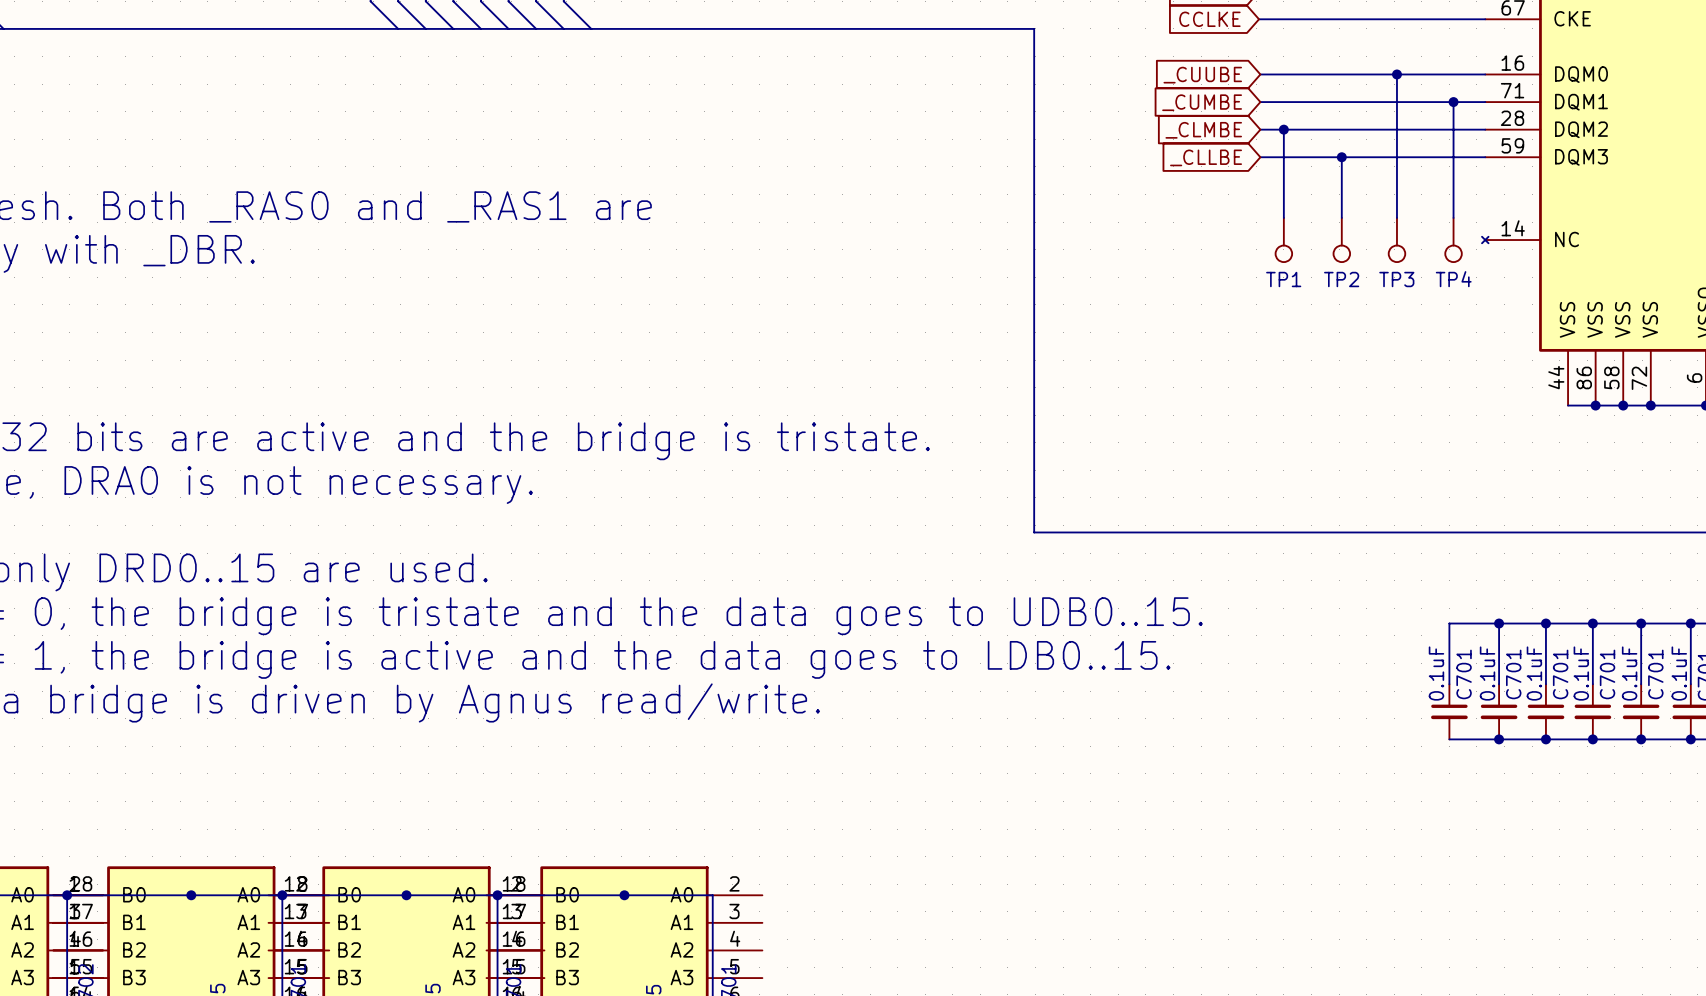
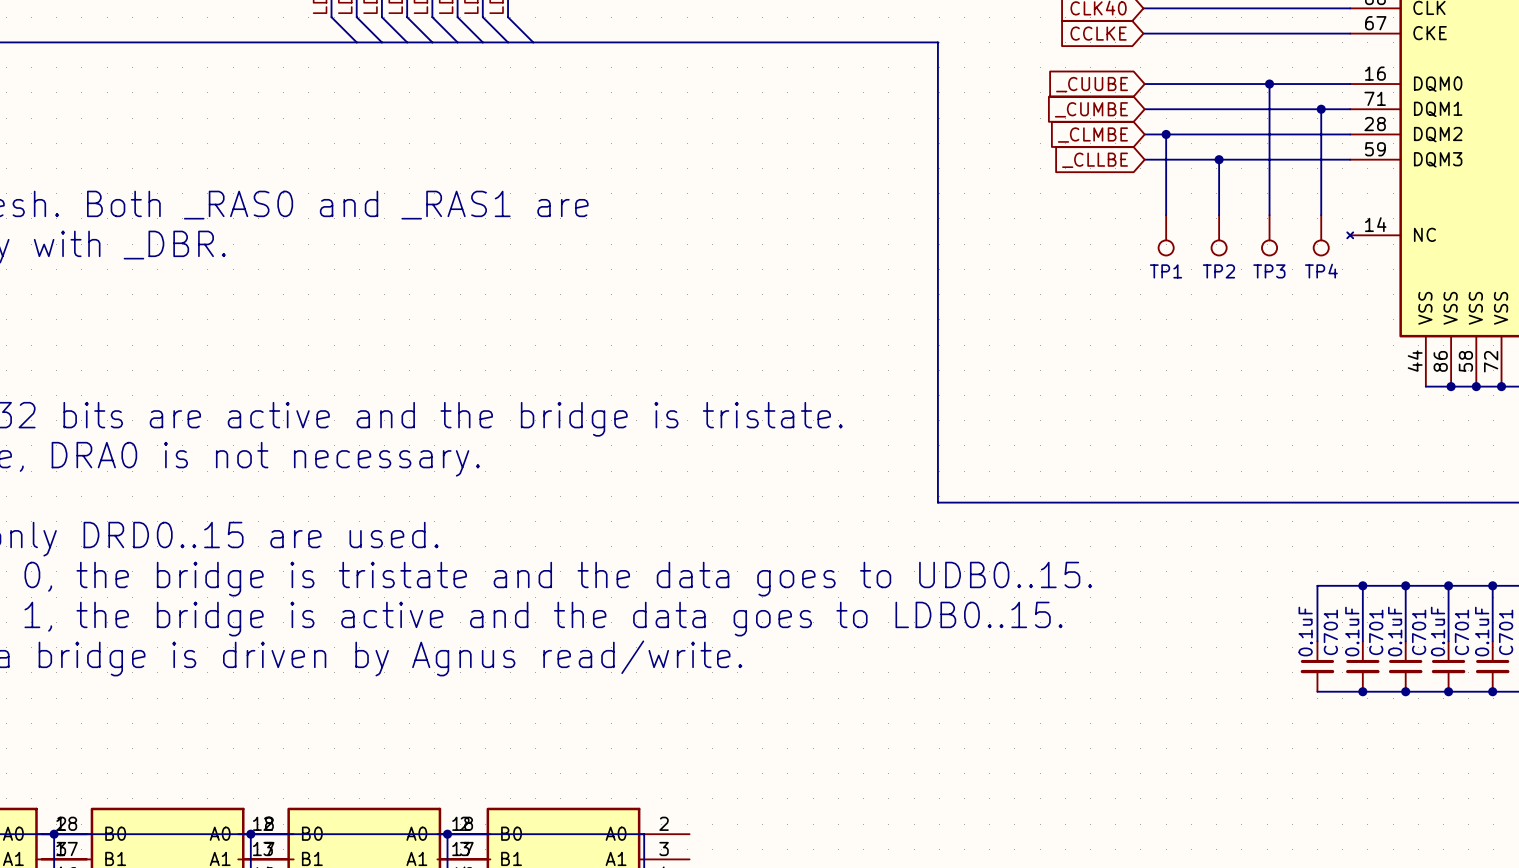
junction: (191, 895) -> none
junction: (406, 895) -> none
junction: (624, 895) -> none

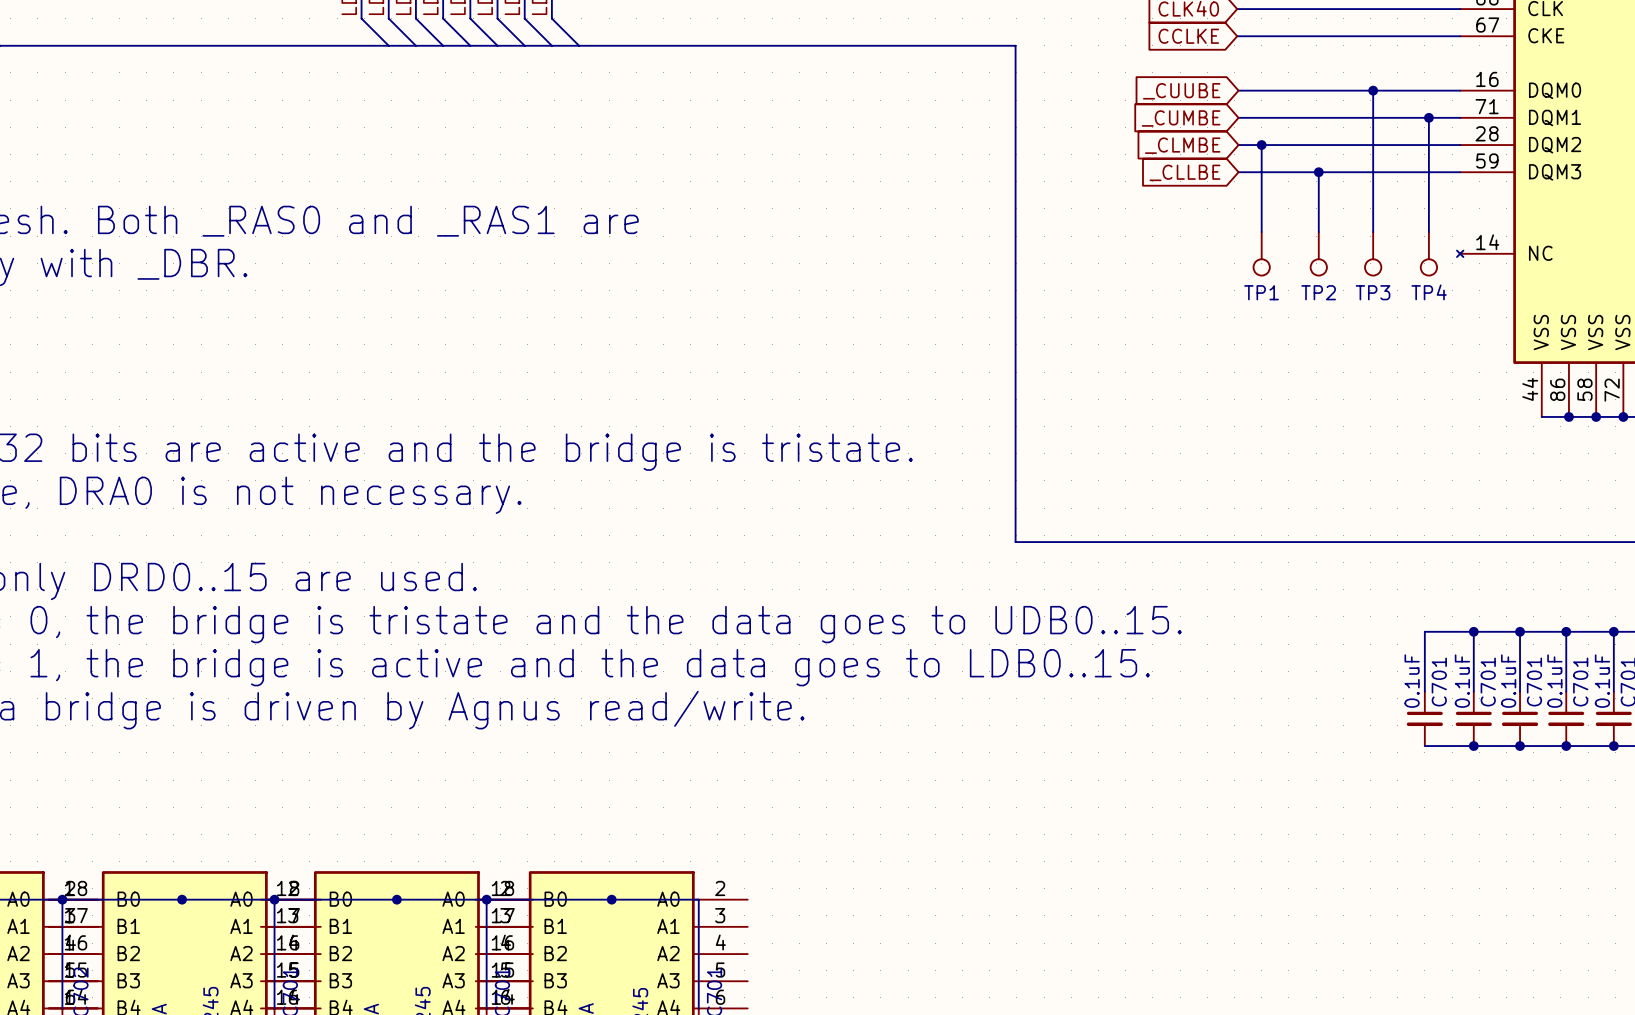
junction: none -> (182, 899)
junction: none -> (396, 899)
junction: none -> (611, 899)

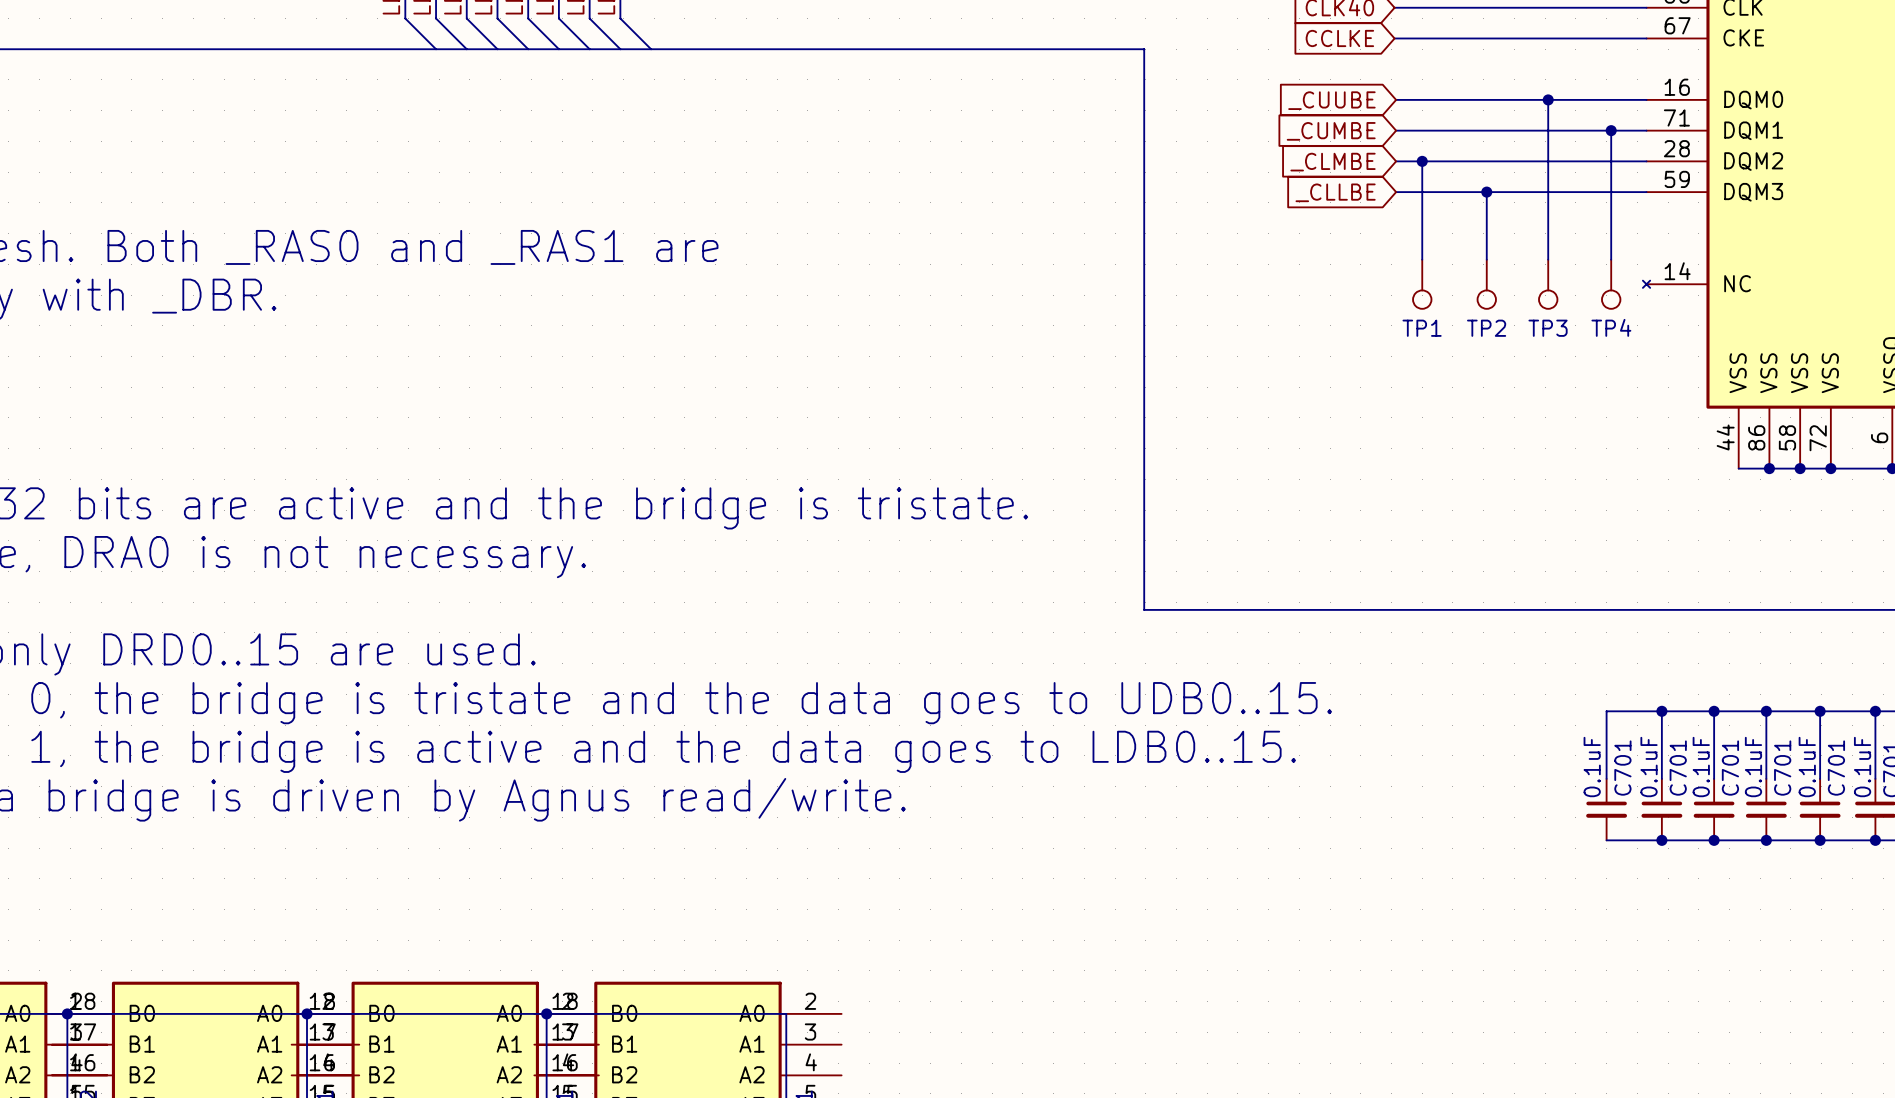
junction: (182, 899) -> none
junction: (396, 899) -> none
junction: (611, 899) -> none

